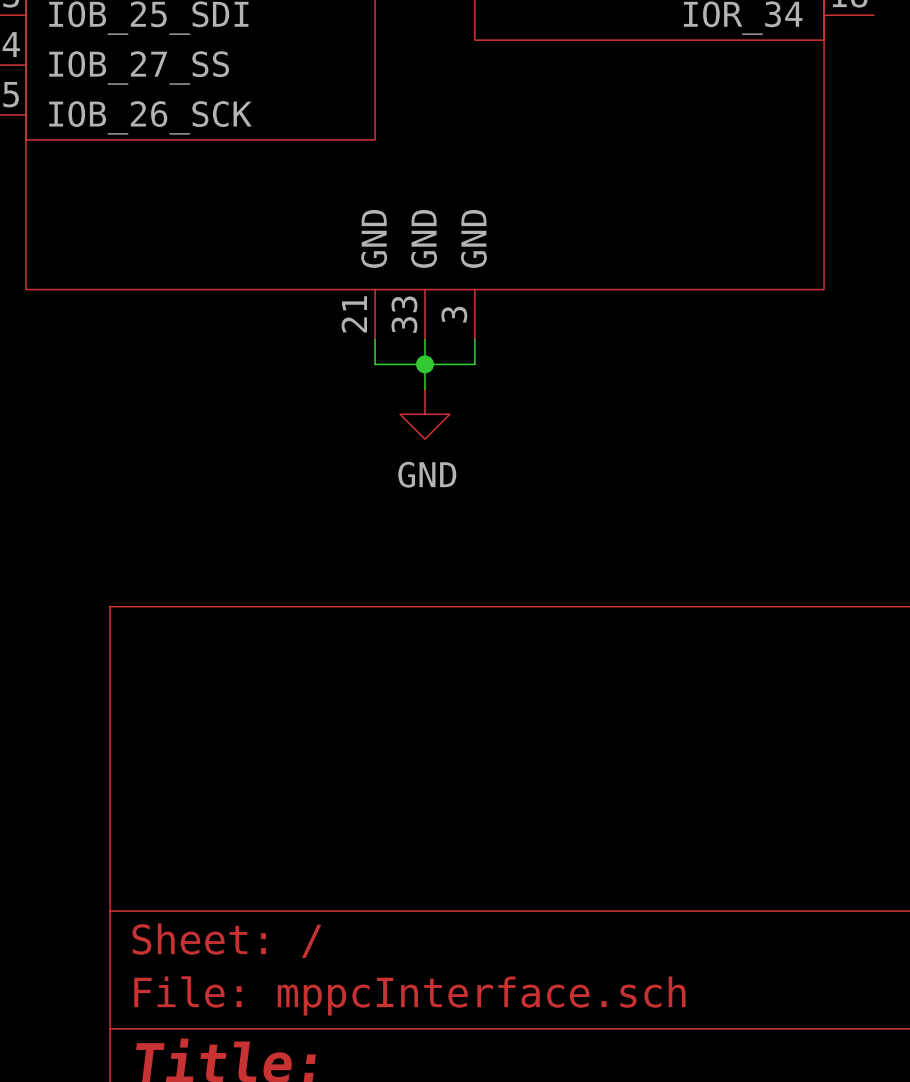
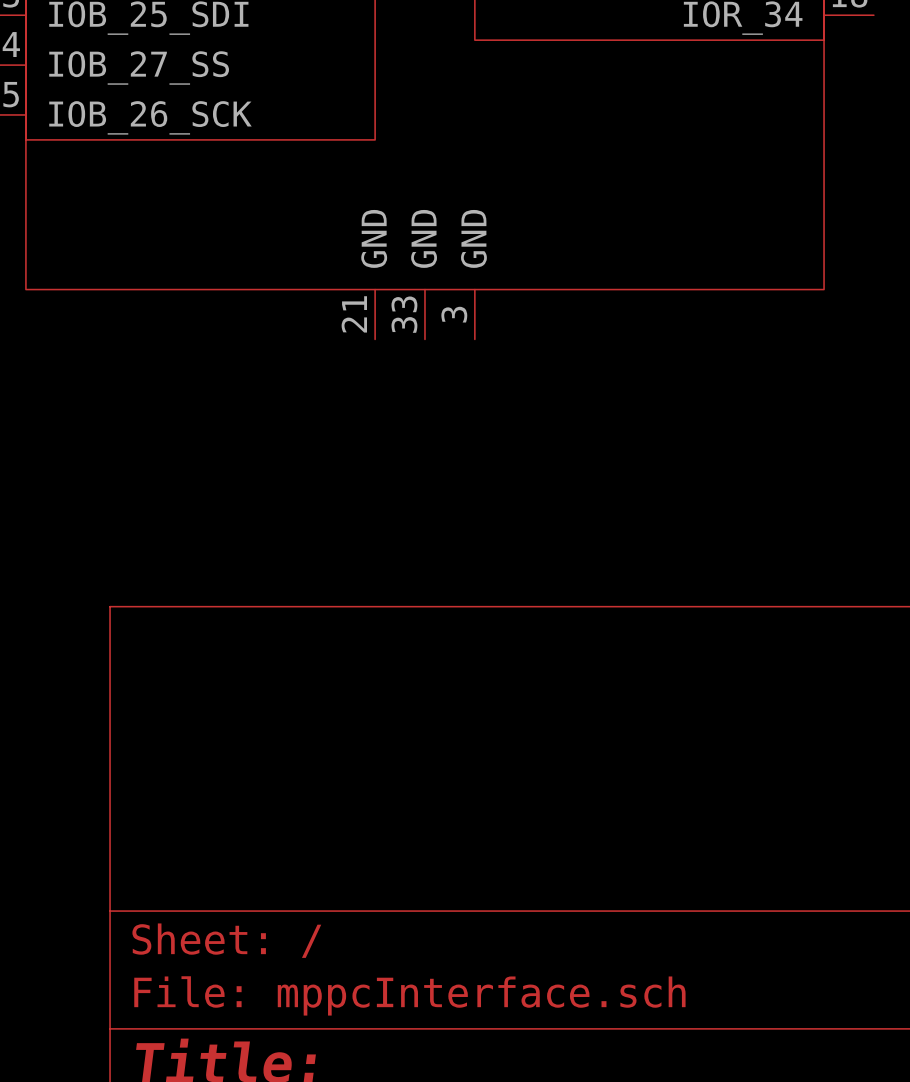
wire: (375, 339) (375, 364) (474, 364) (474, 339) -> none
wire: (424, 339) (424, 389) -> none
junction: (424, 364) -> none
power symbol: GND (424, 414) -> none

